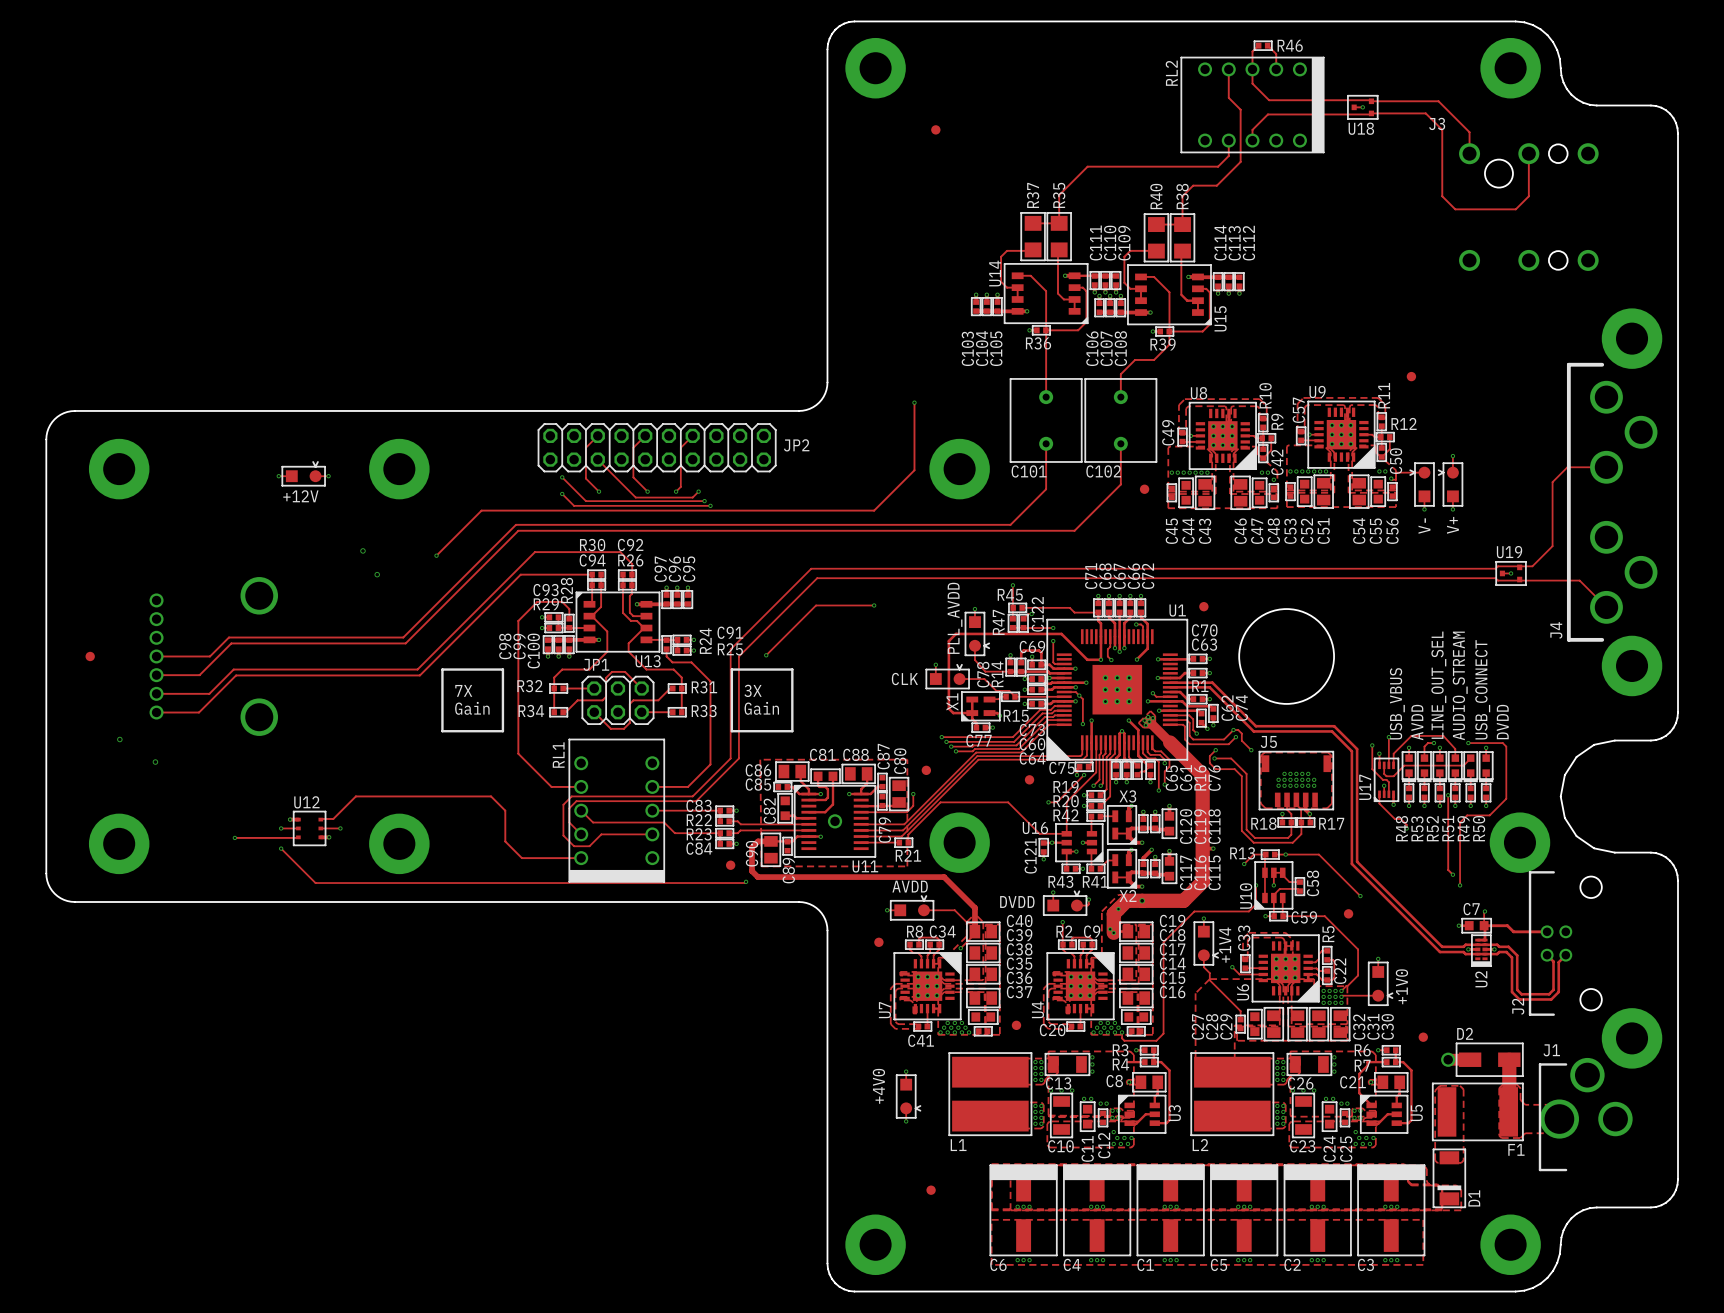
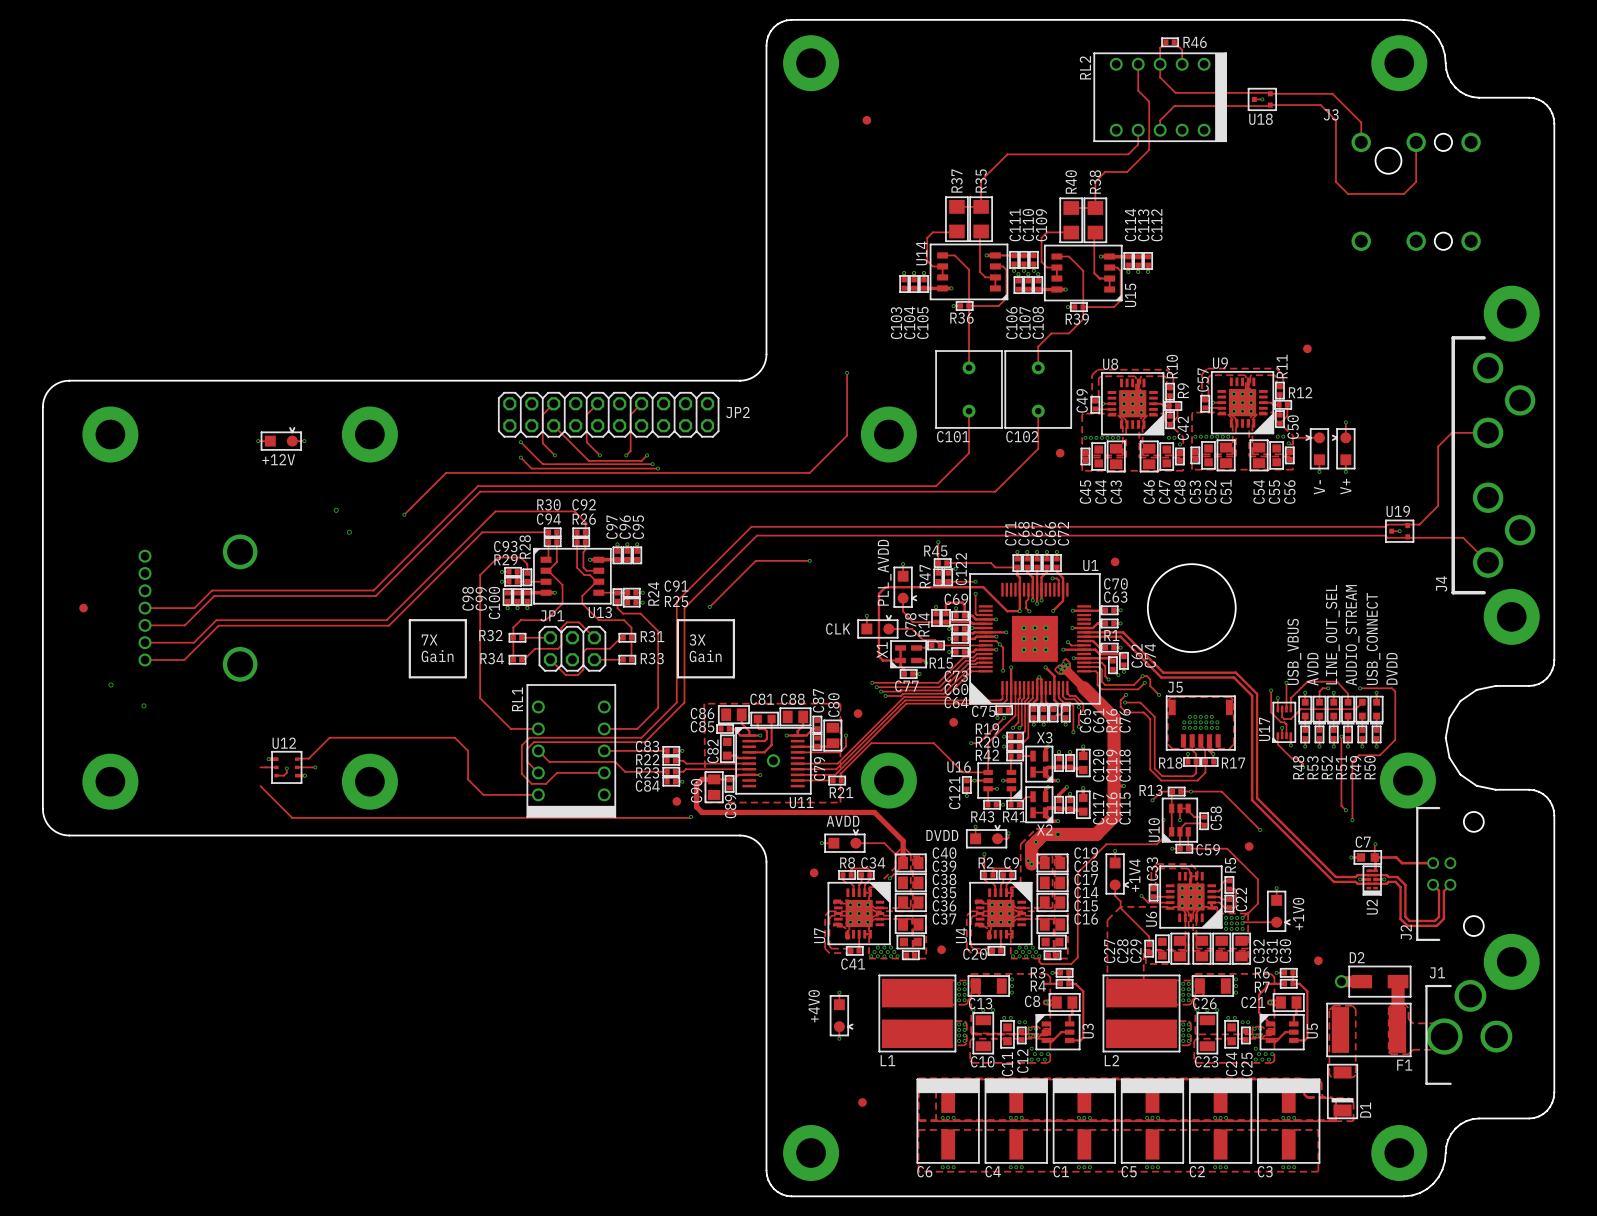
via: (281, 828) -> none
via: none -> (286, 768)
via: (234, 837) -> none
track: (298, 837) (234, 837) -> (276, 775) (284, 775) (286, 772) (286, 768)
via: (281, 848) -> none

